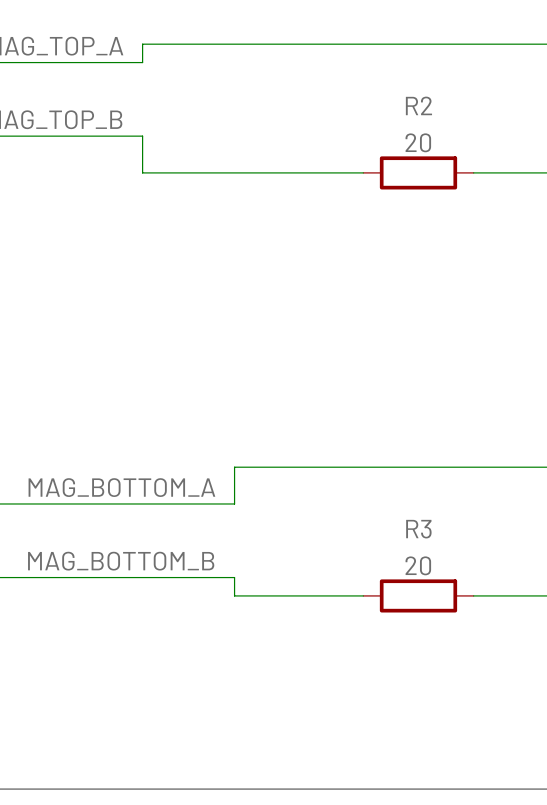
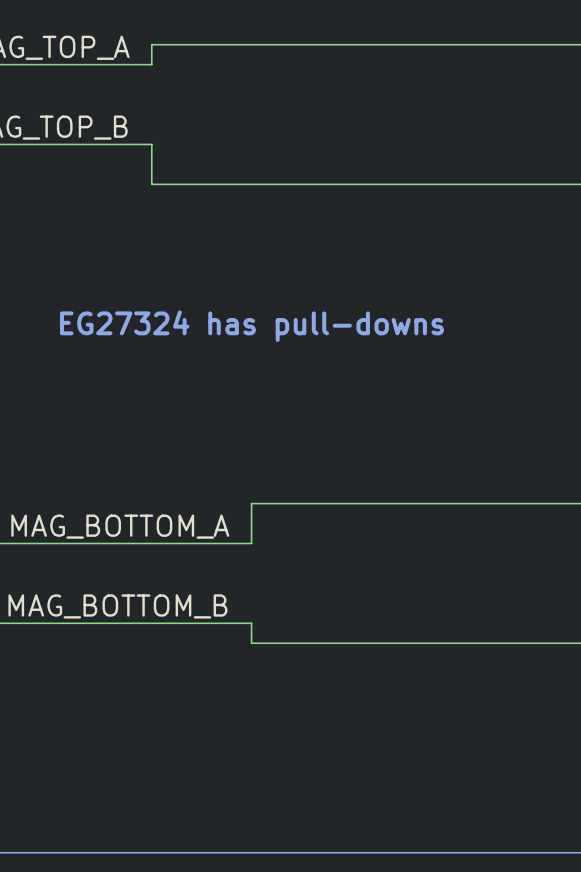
wire: none -> (391, 184) (510, 184)
R2: 20 (418, 172) -> none
text: none -> EG27324 has pull-downs (252, 326)
wire: none -> (391, 643) (510, 643)
R3: 20 (418, 595) -> none

